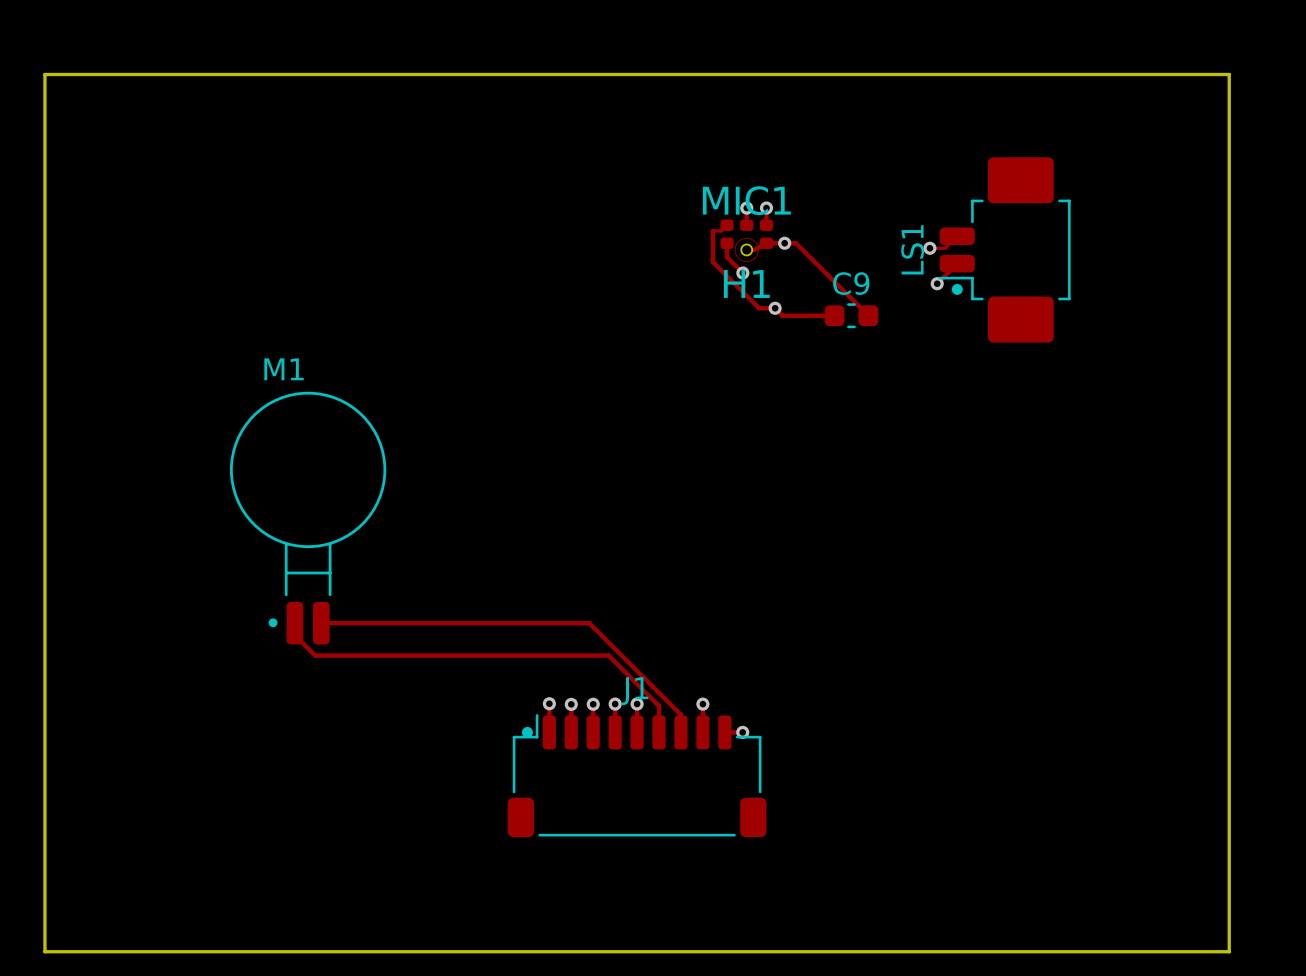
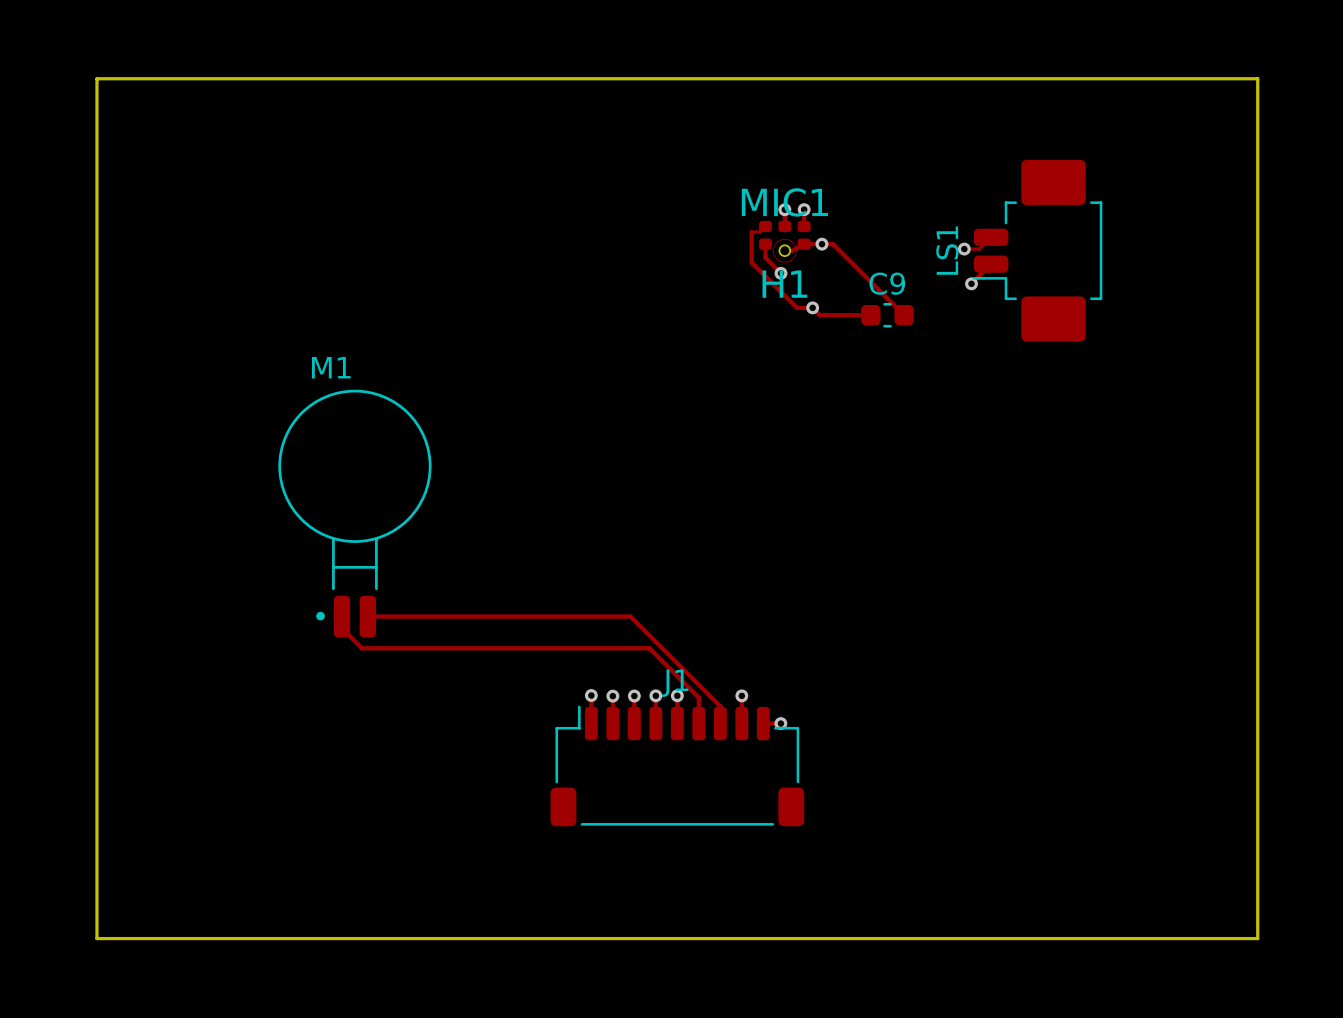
LS1 footprint: [938, 157, 1071, 343] -> [972, 159, 1103, 342]
J1 footprint: [507, 714, 767, 838] -> [550, 705, 805, 827]

